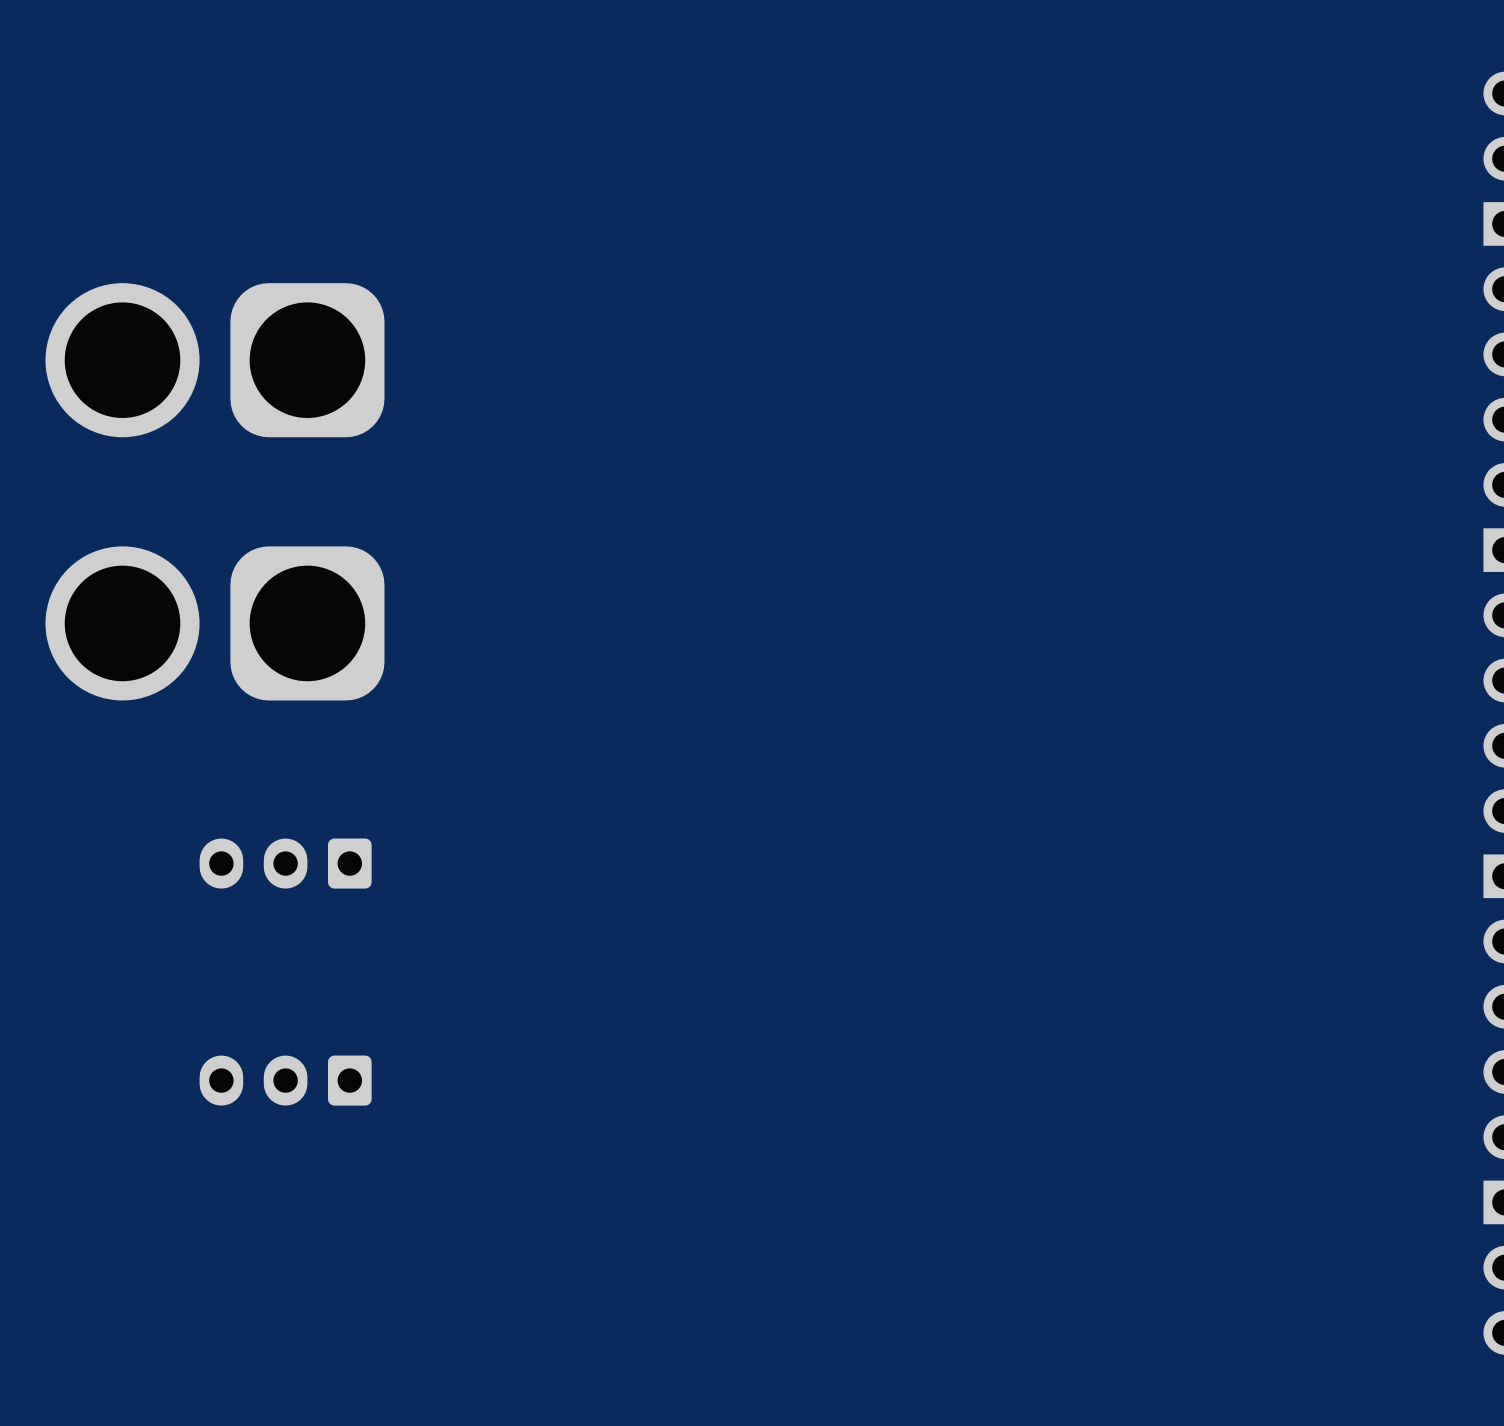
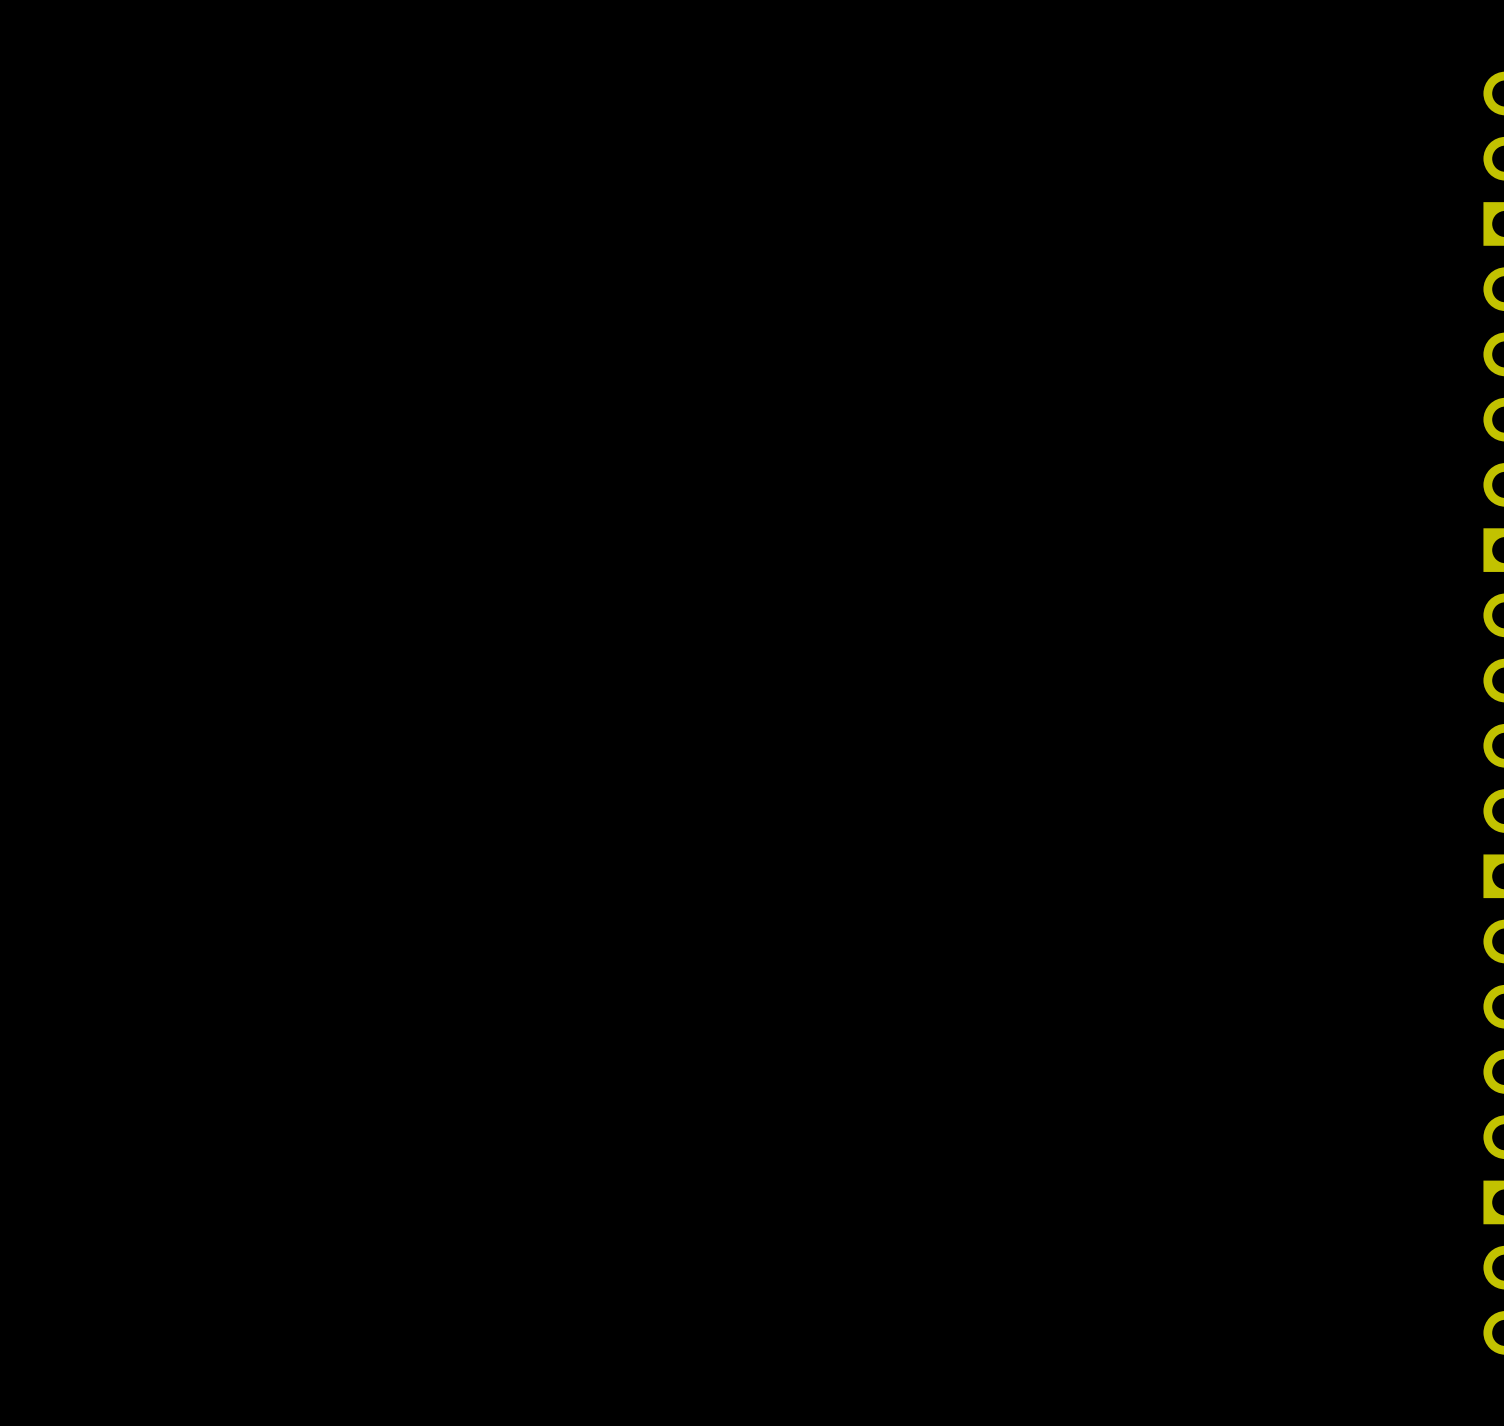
part: (214, 360) -> none
part: (214, 623) -> none
part: (285, 863) -> none
part: (285, 1080) -> none

